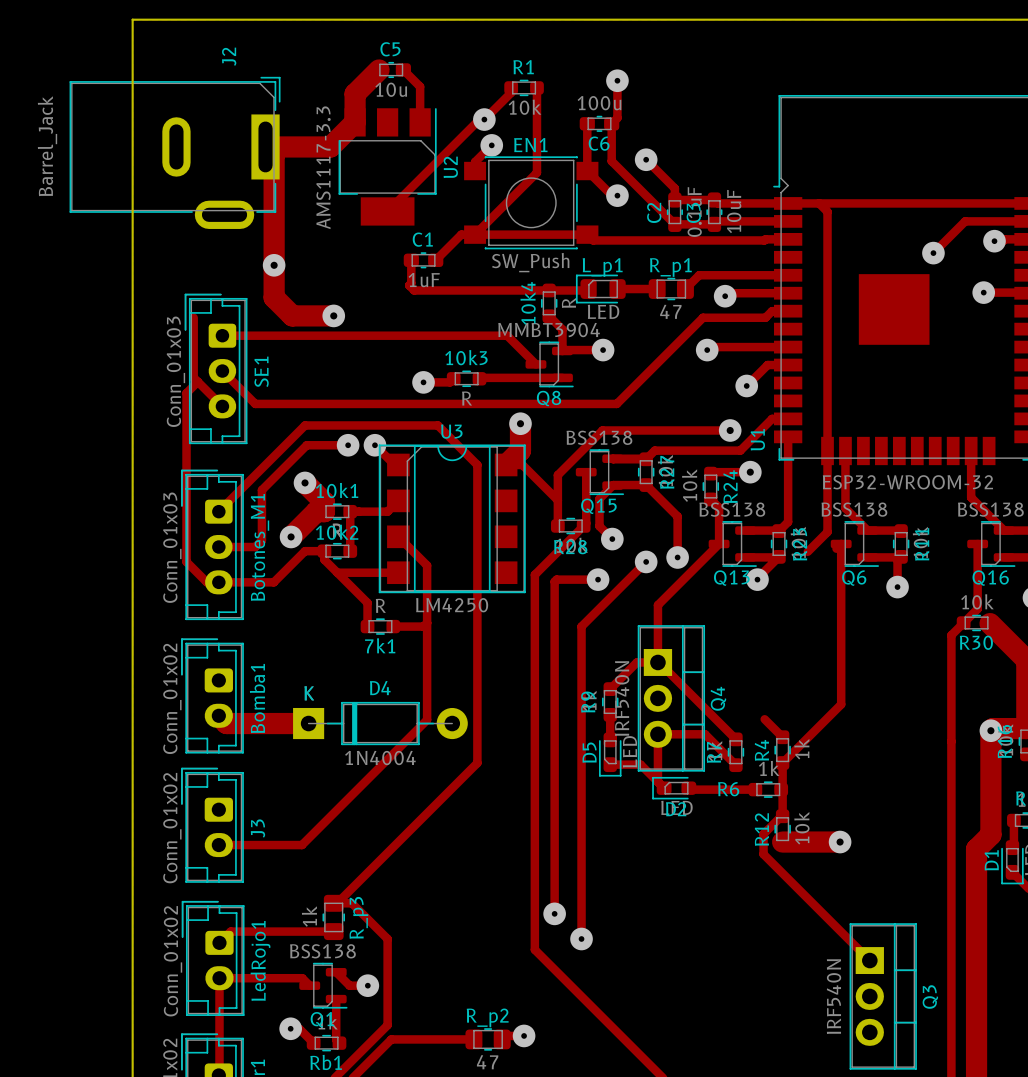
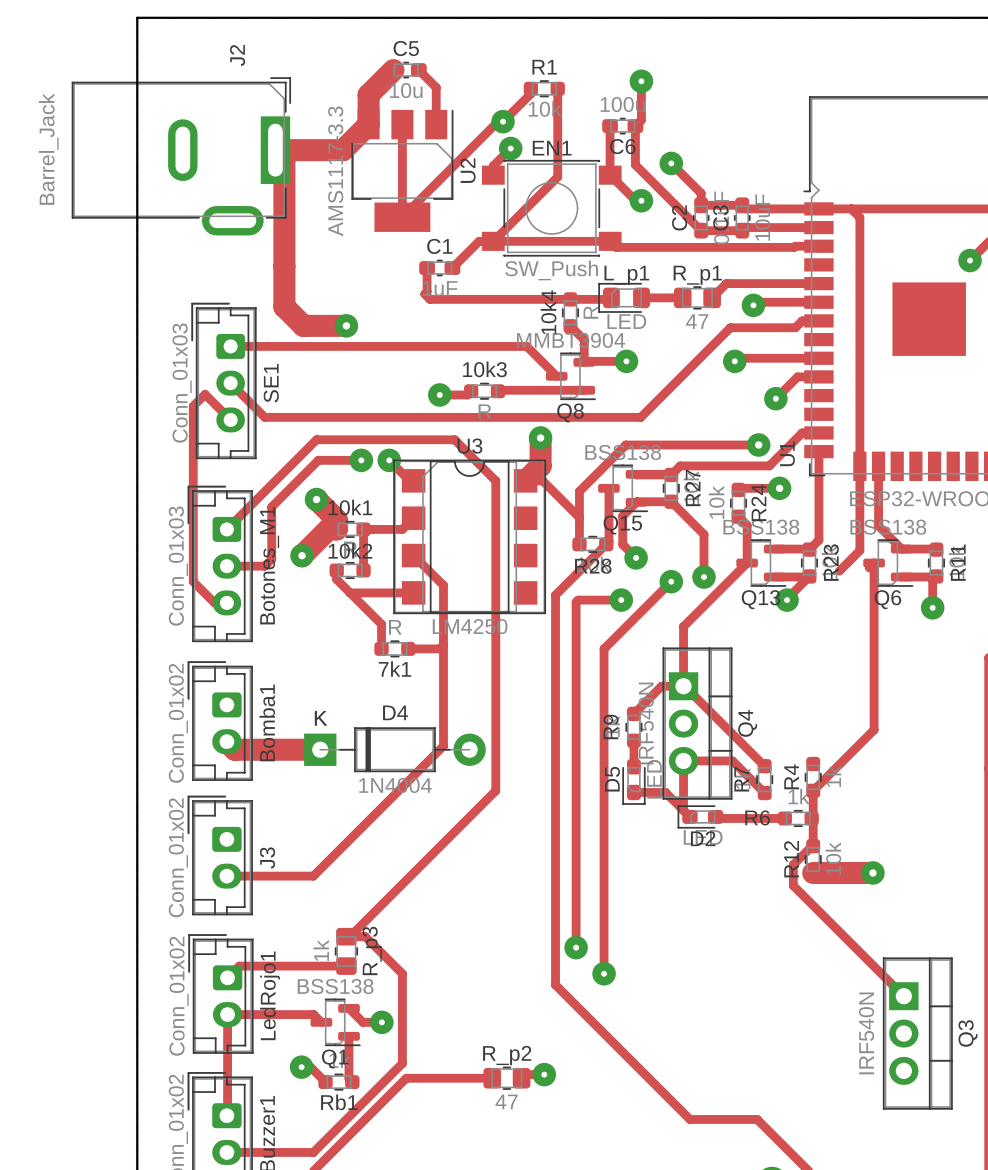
track: none -> (402, 124) (402, 217)
via: (274, 265) -> none
track: (193, 317) (193, 377) (197, 381) -> none
track: (324, 551) (305, 551) (273, 582) (218, 582) -> none
track: (764, 719) (782, 737) -> none

